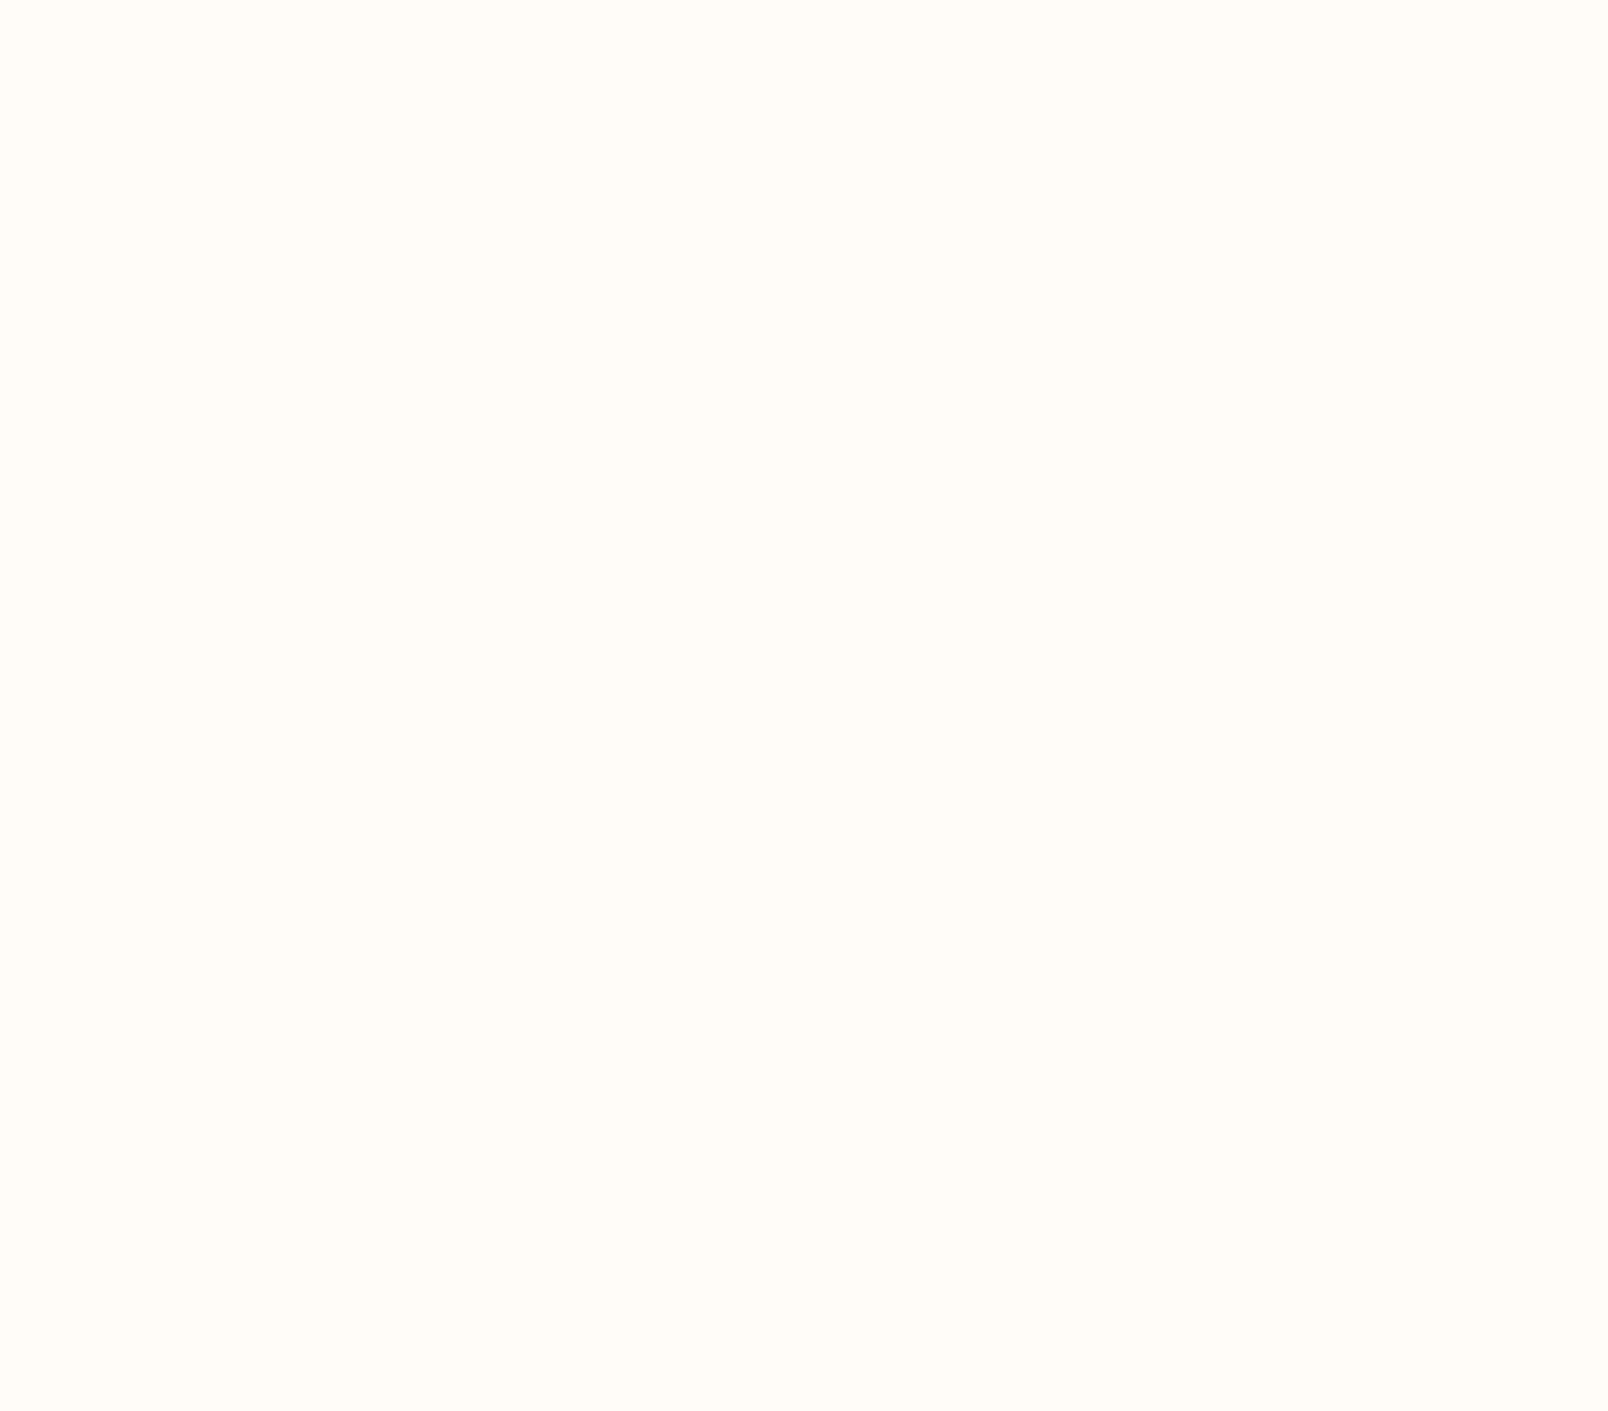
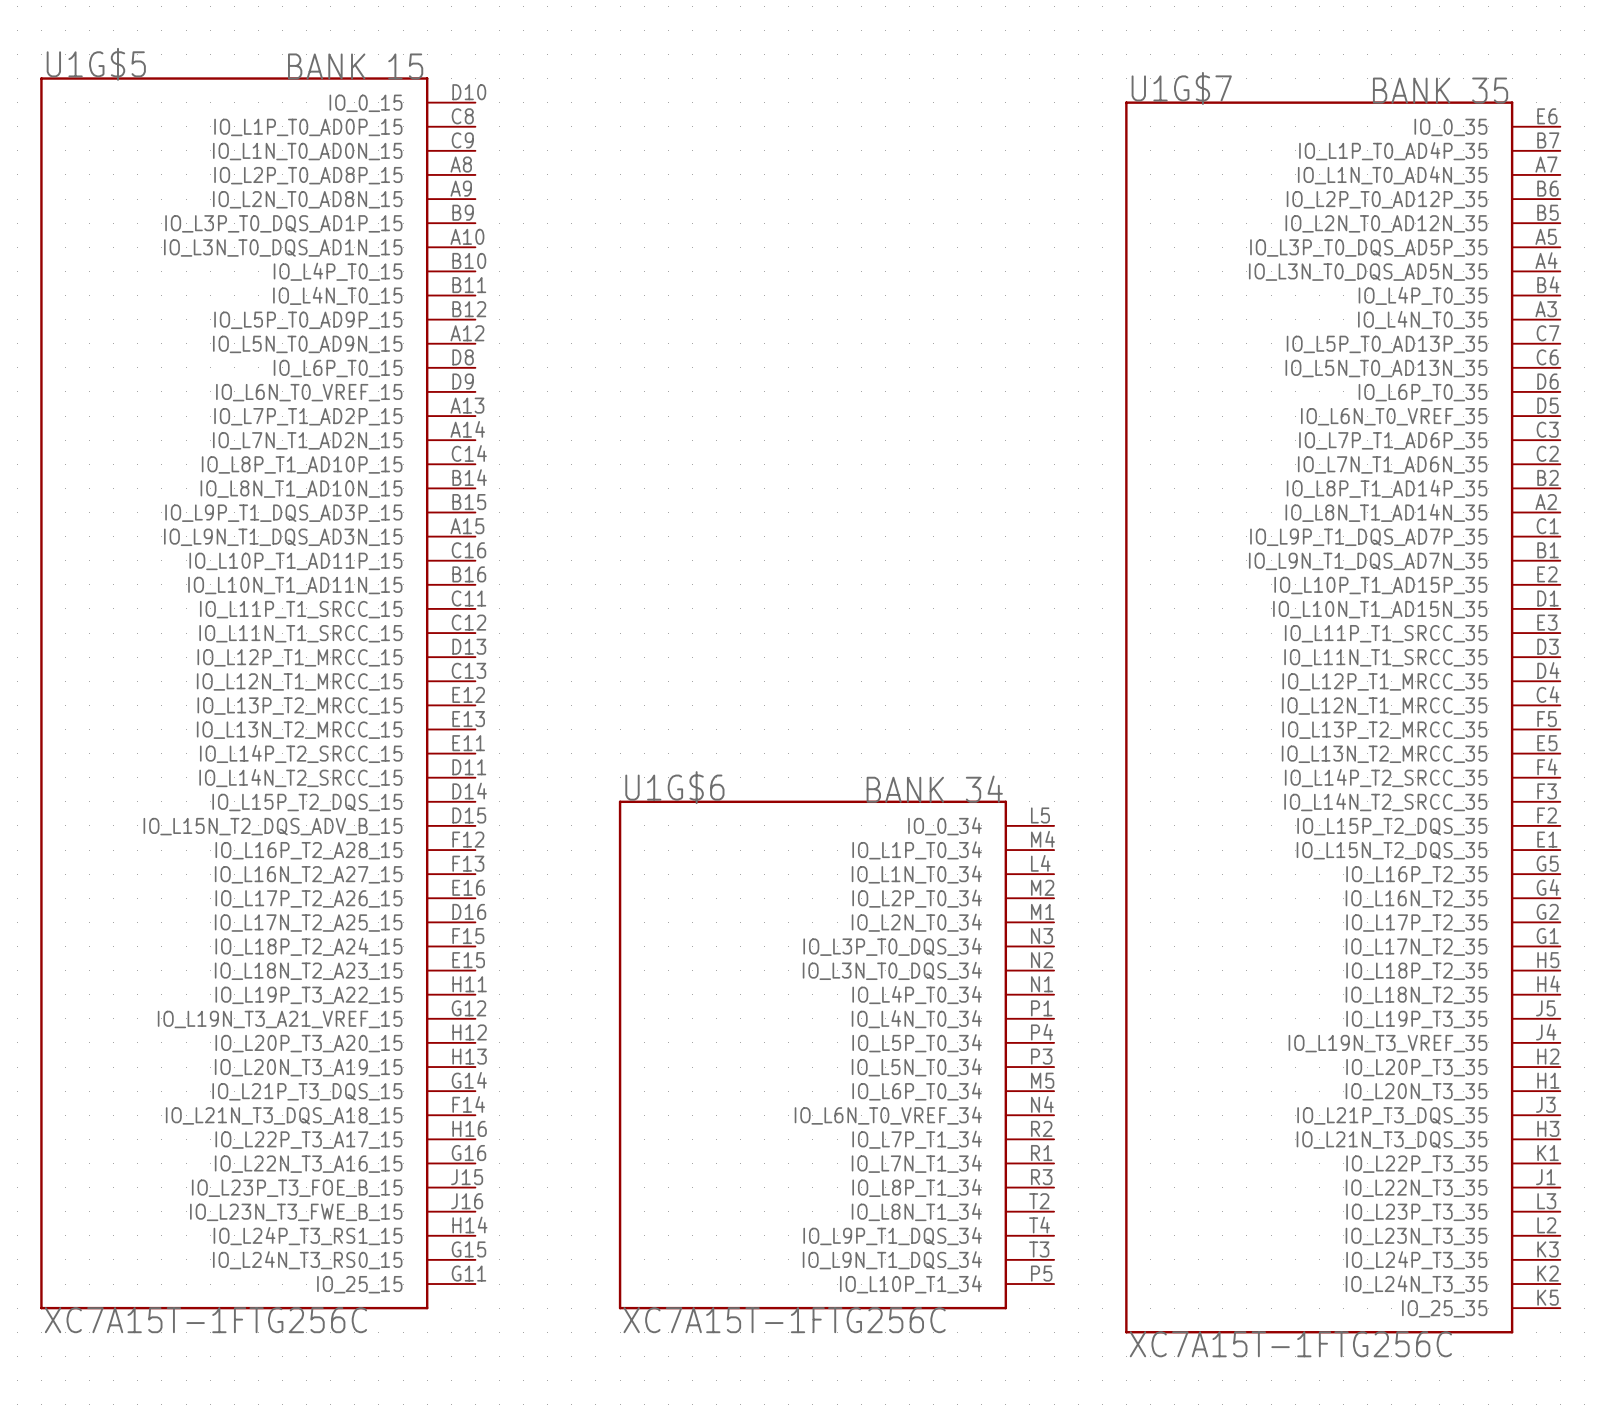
U1G$5: none -> XC7A15T-1FTG256C (257, 693)
U1G$7: none -> XC7A15T-1FTG256C (1342, 717)
U1G$6: none -> XC7A15T-1FTG256C (836, 1054)

